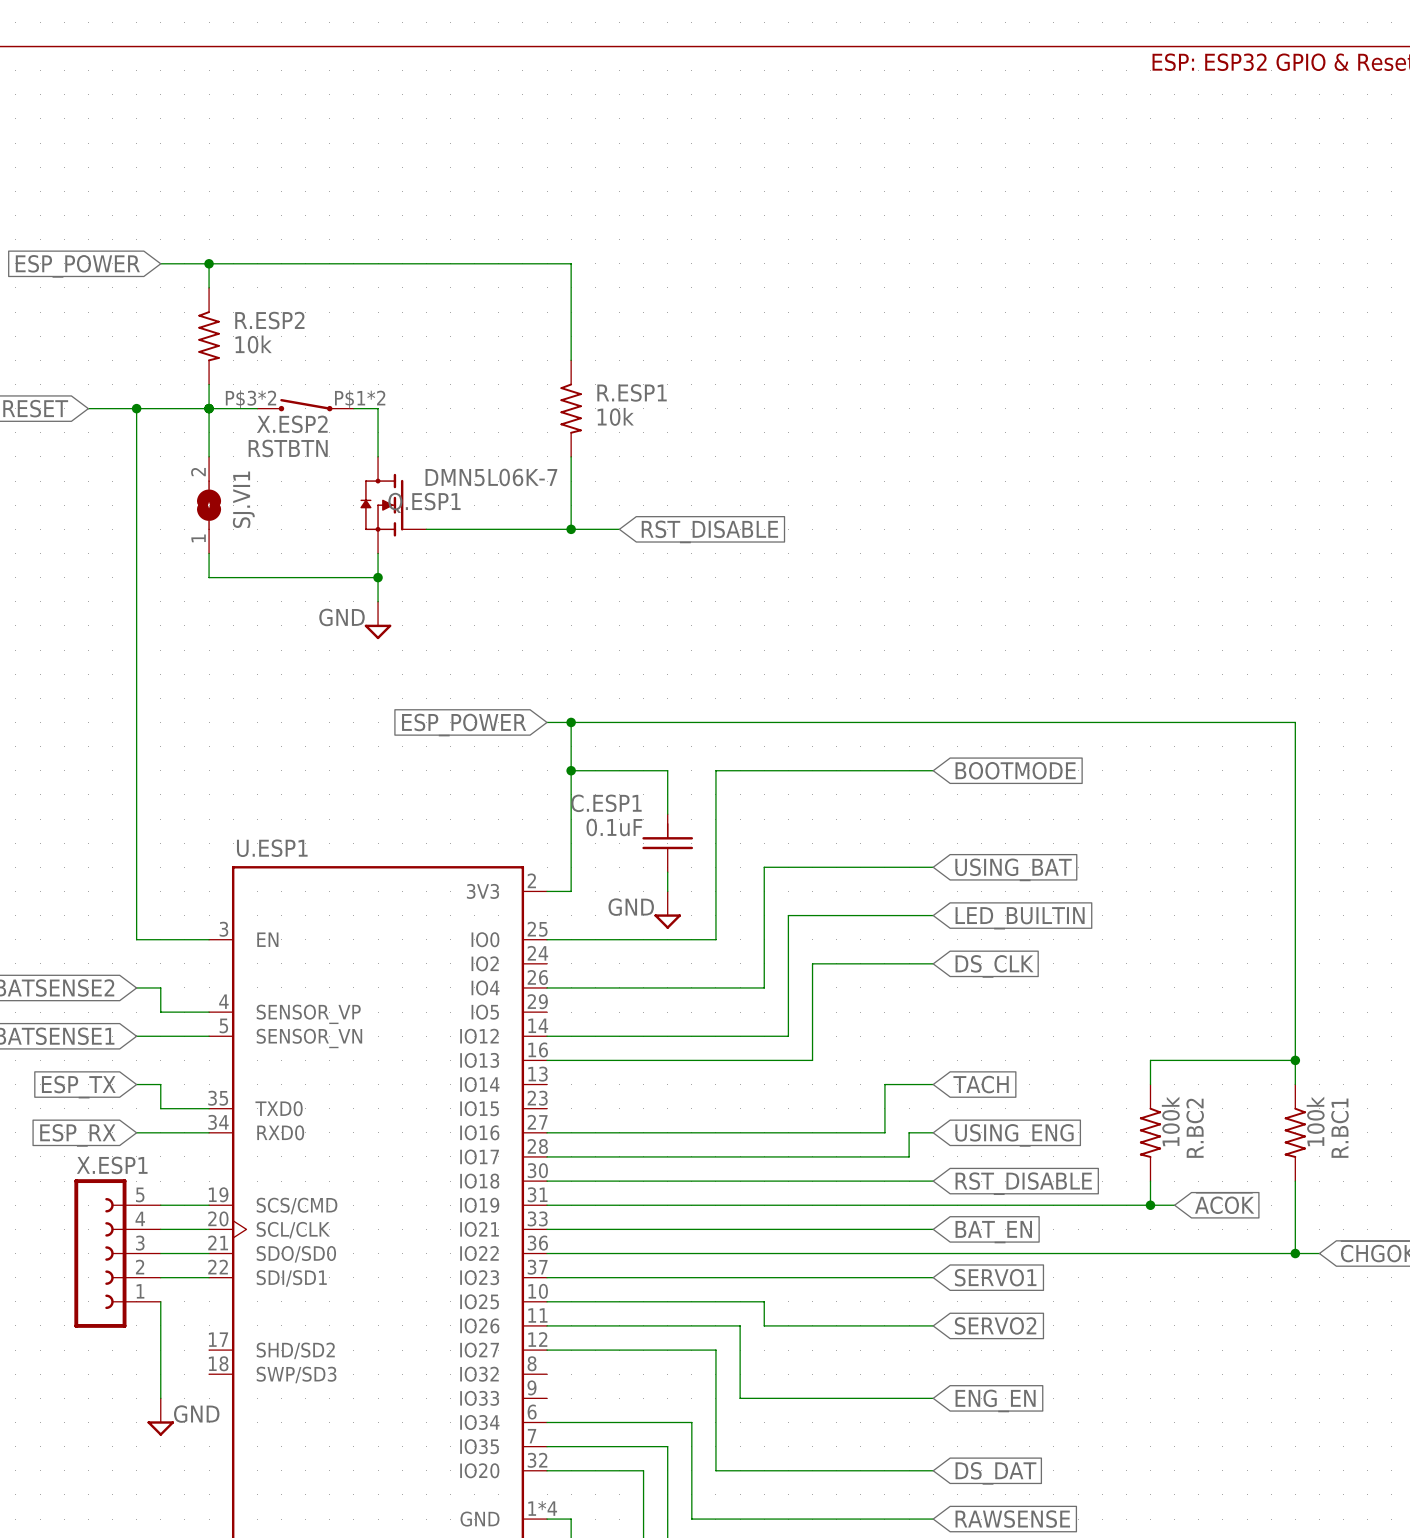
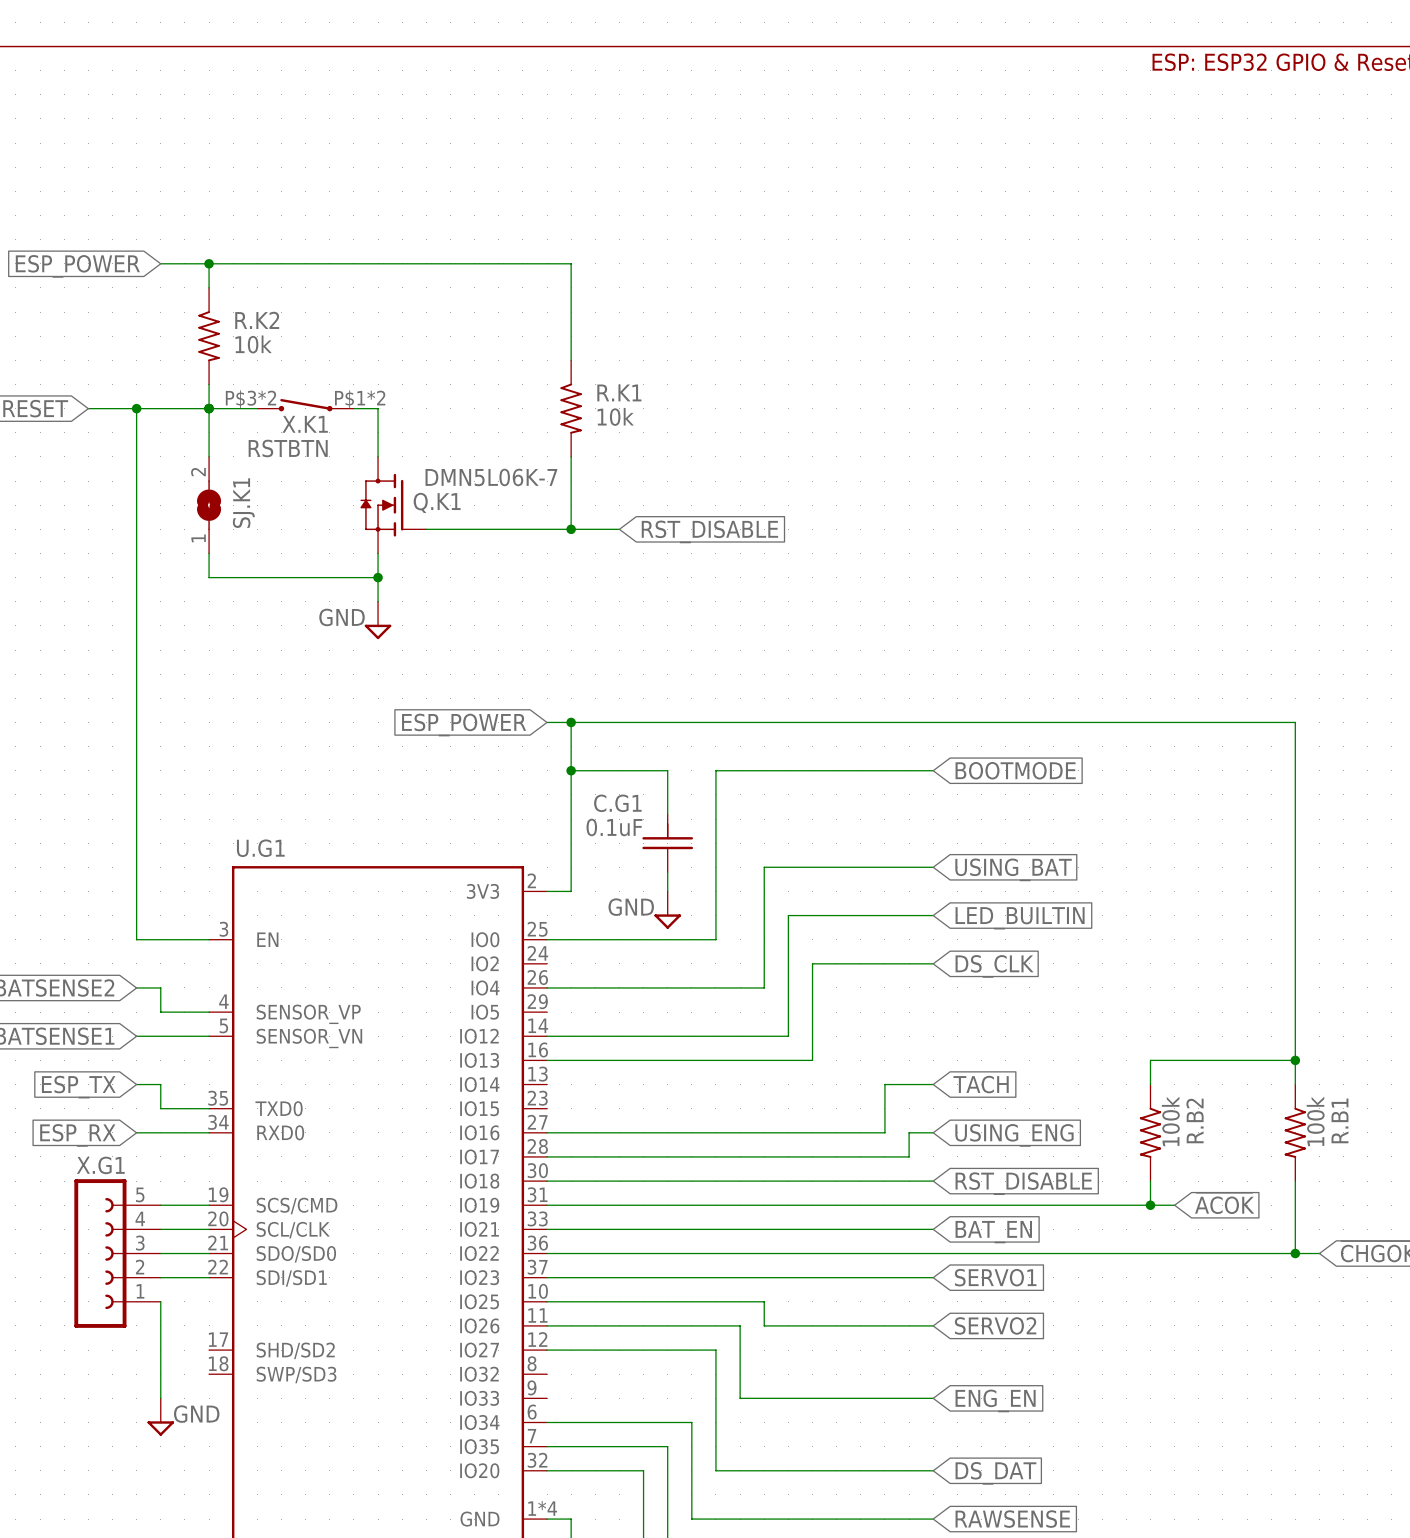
R.ESP2 name: R.ESP2 (269, 320) -> R.K2 (257, 320)
R.ESP1 name: R.ESP1 (632, 392) -> R.K1 (619, 392)
X.ESP2 name: X.ESP2 (292, 424) -> X.K1 (305, 424)
SJ.VI1 name: SJ.VI1 (243, 499) -> SJ.K1 (243, 503)
Q.ESP1 name: Q.ESP1 (424, 502) -> Q.K1 (437, 502)
C.ESP1 name: C.ESP1 (606, 803) -> C.G1 (617, 803)
U.ESP1 name: U.ESP1 (272, 848) -> U.G1 (260, 848)
R.BC2 name: R.BC2 (1195, 1128) -> R.B2 (1194, 1120)
R.BC1 name: R.BC1 (1339, 1128) -> R.B1 (1339, 1120)
X.ESP1 name: X.ESP1 (112, 1165) -> X.G1 (100, 1165)

